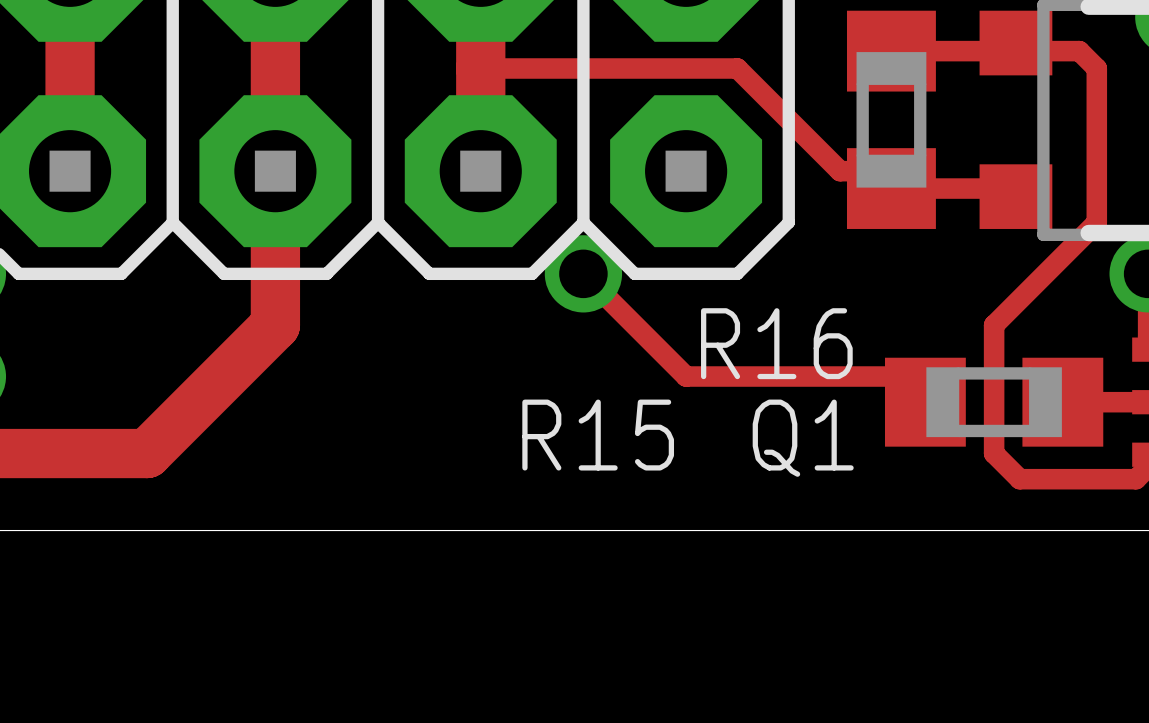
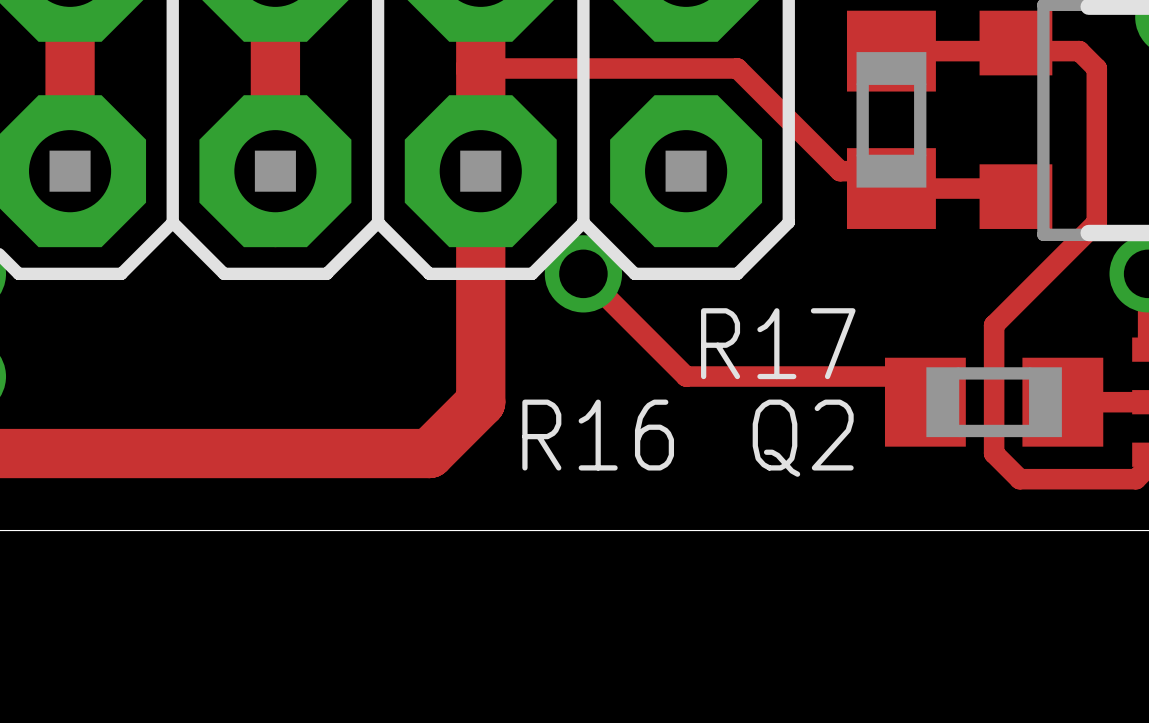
track: (275, 222) (275, 325) (147, 453) -> (480, 171) (480, 402) (429, 453) (147, 453)
R16 name: R16 (776, 343) -> R17 (778, 343)
R15 name: R15 (598, 435) -> R16 (598, 435)
Q1 name: Q1 (803, 438) -> Q2 (803, 438)

